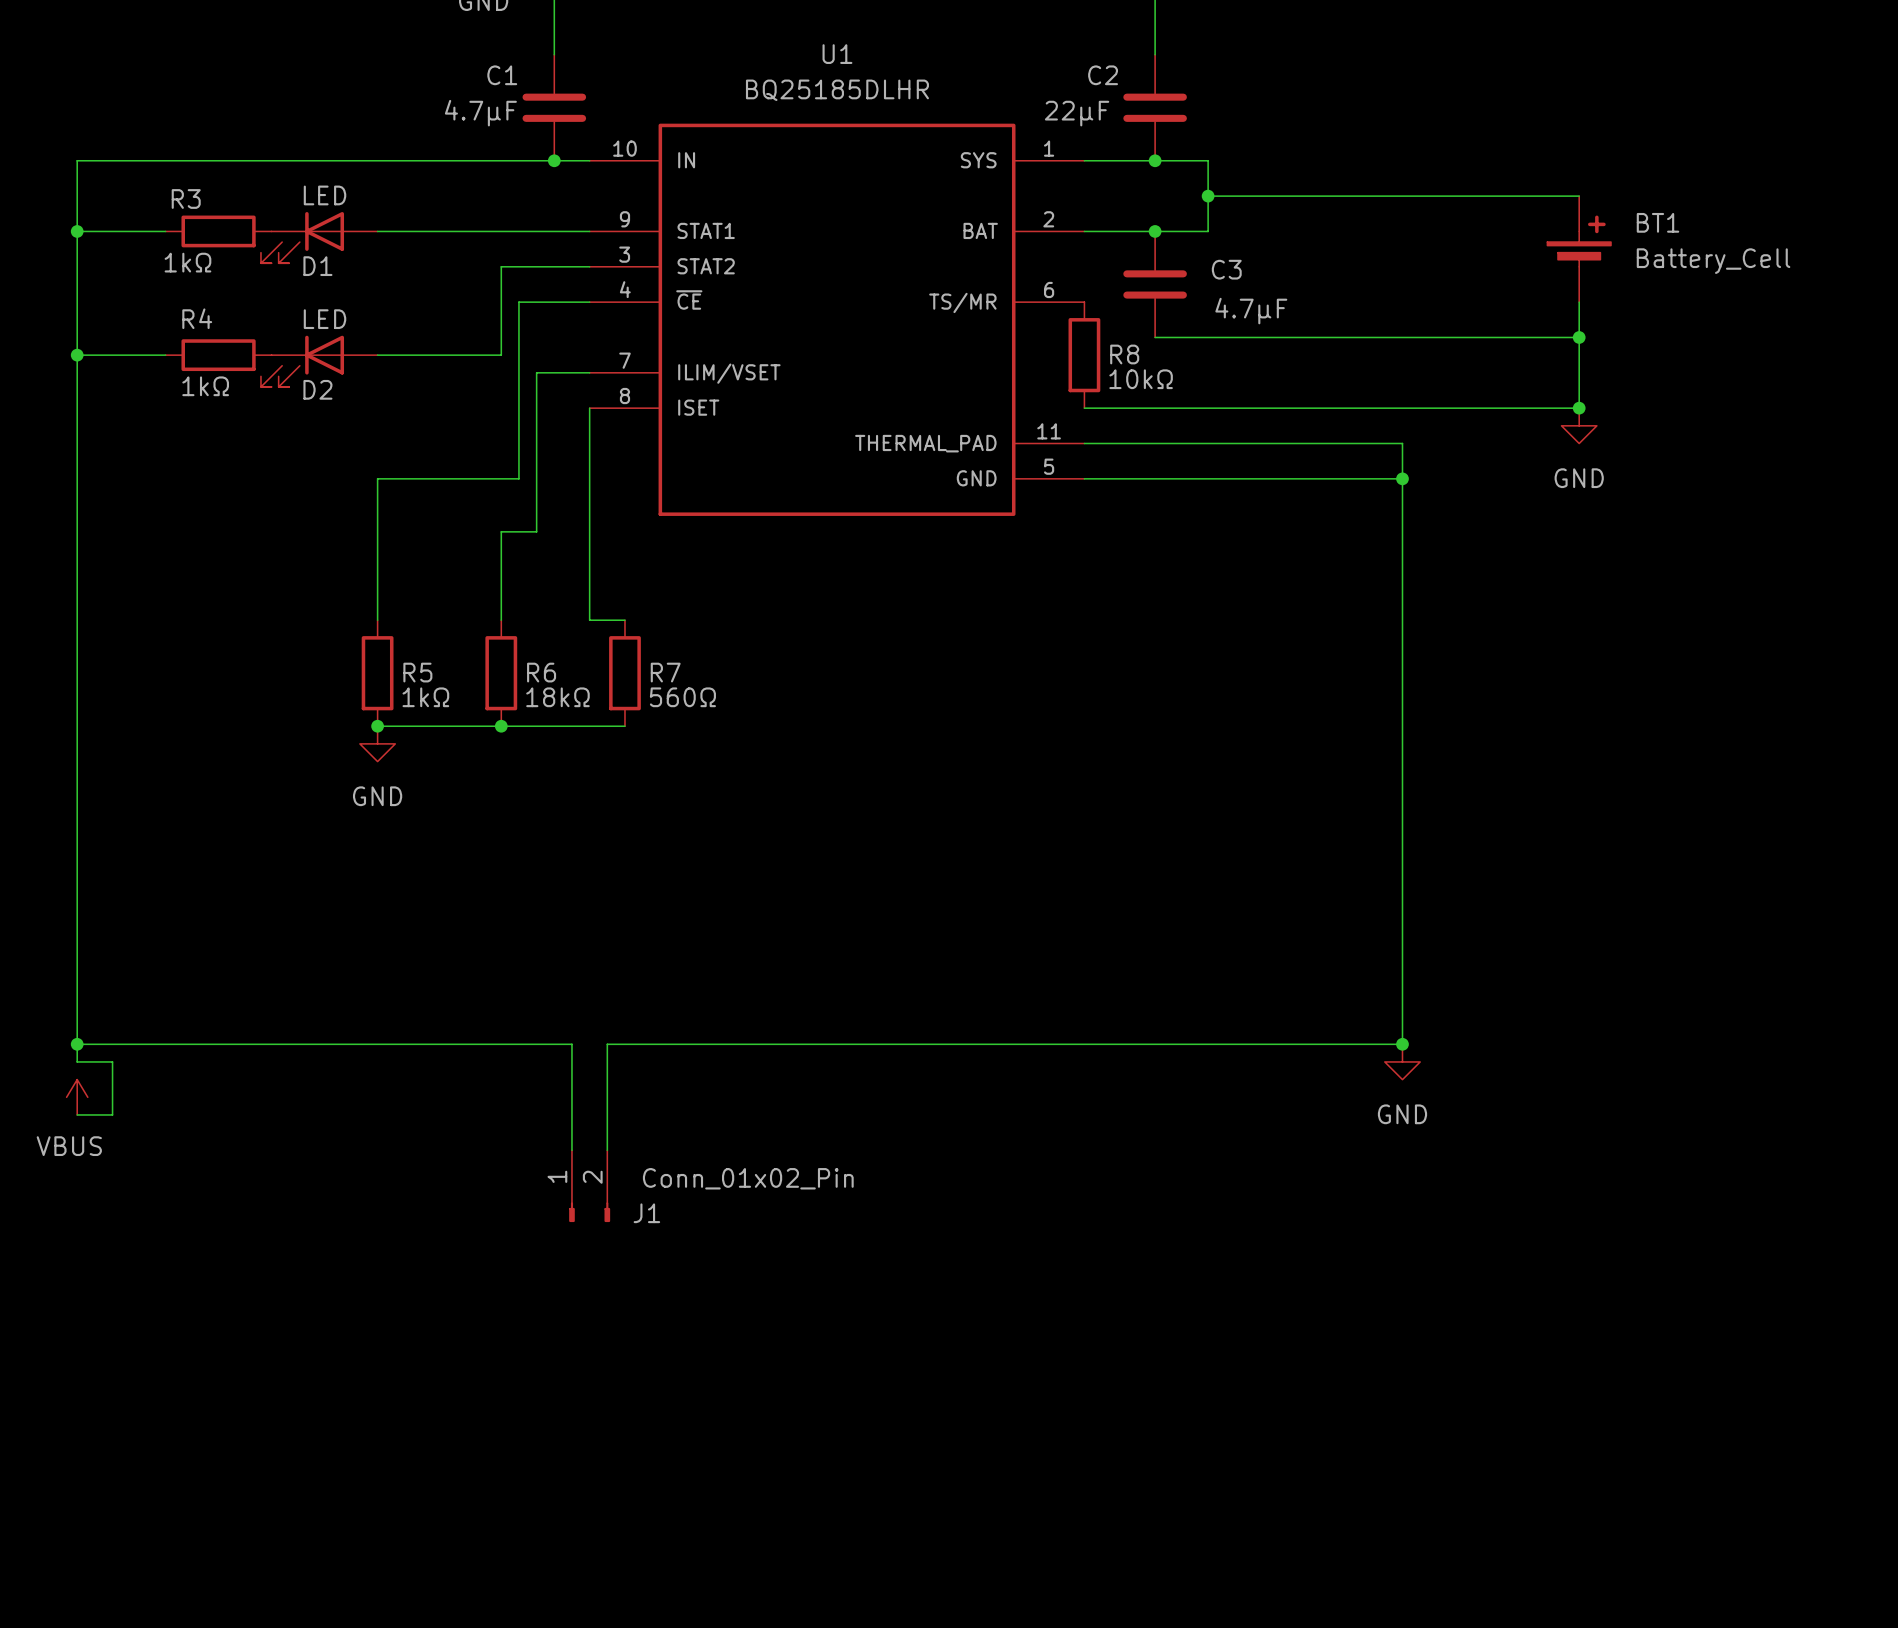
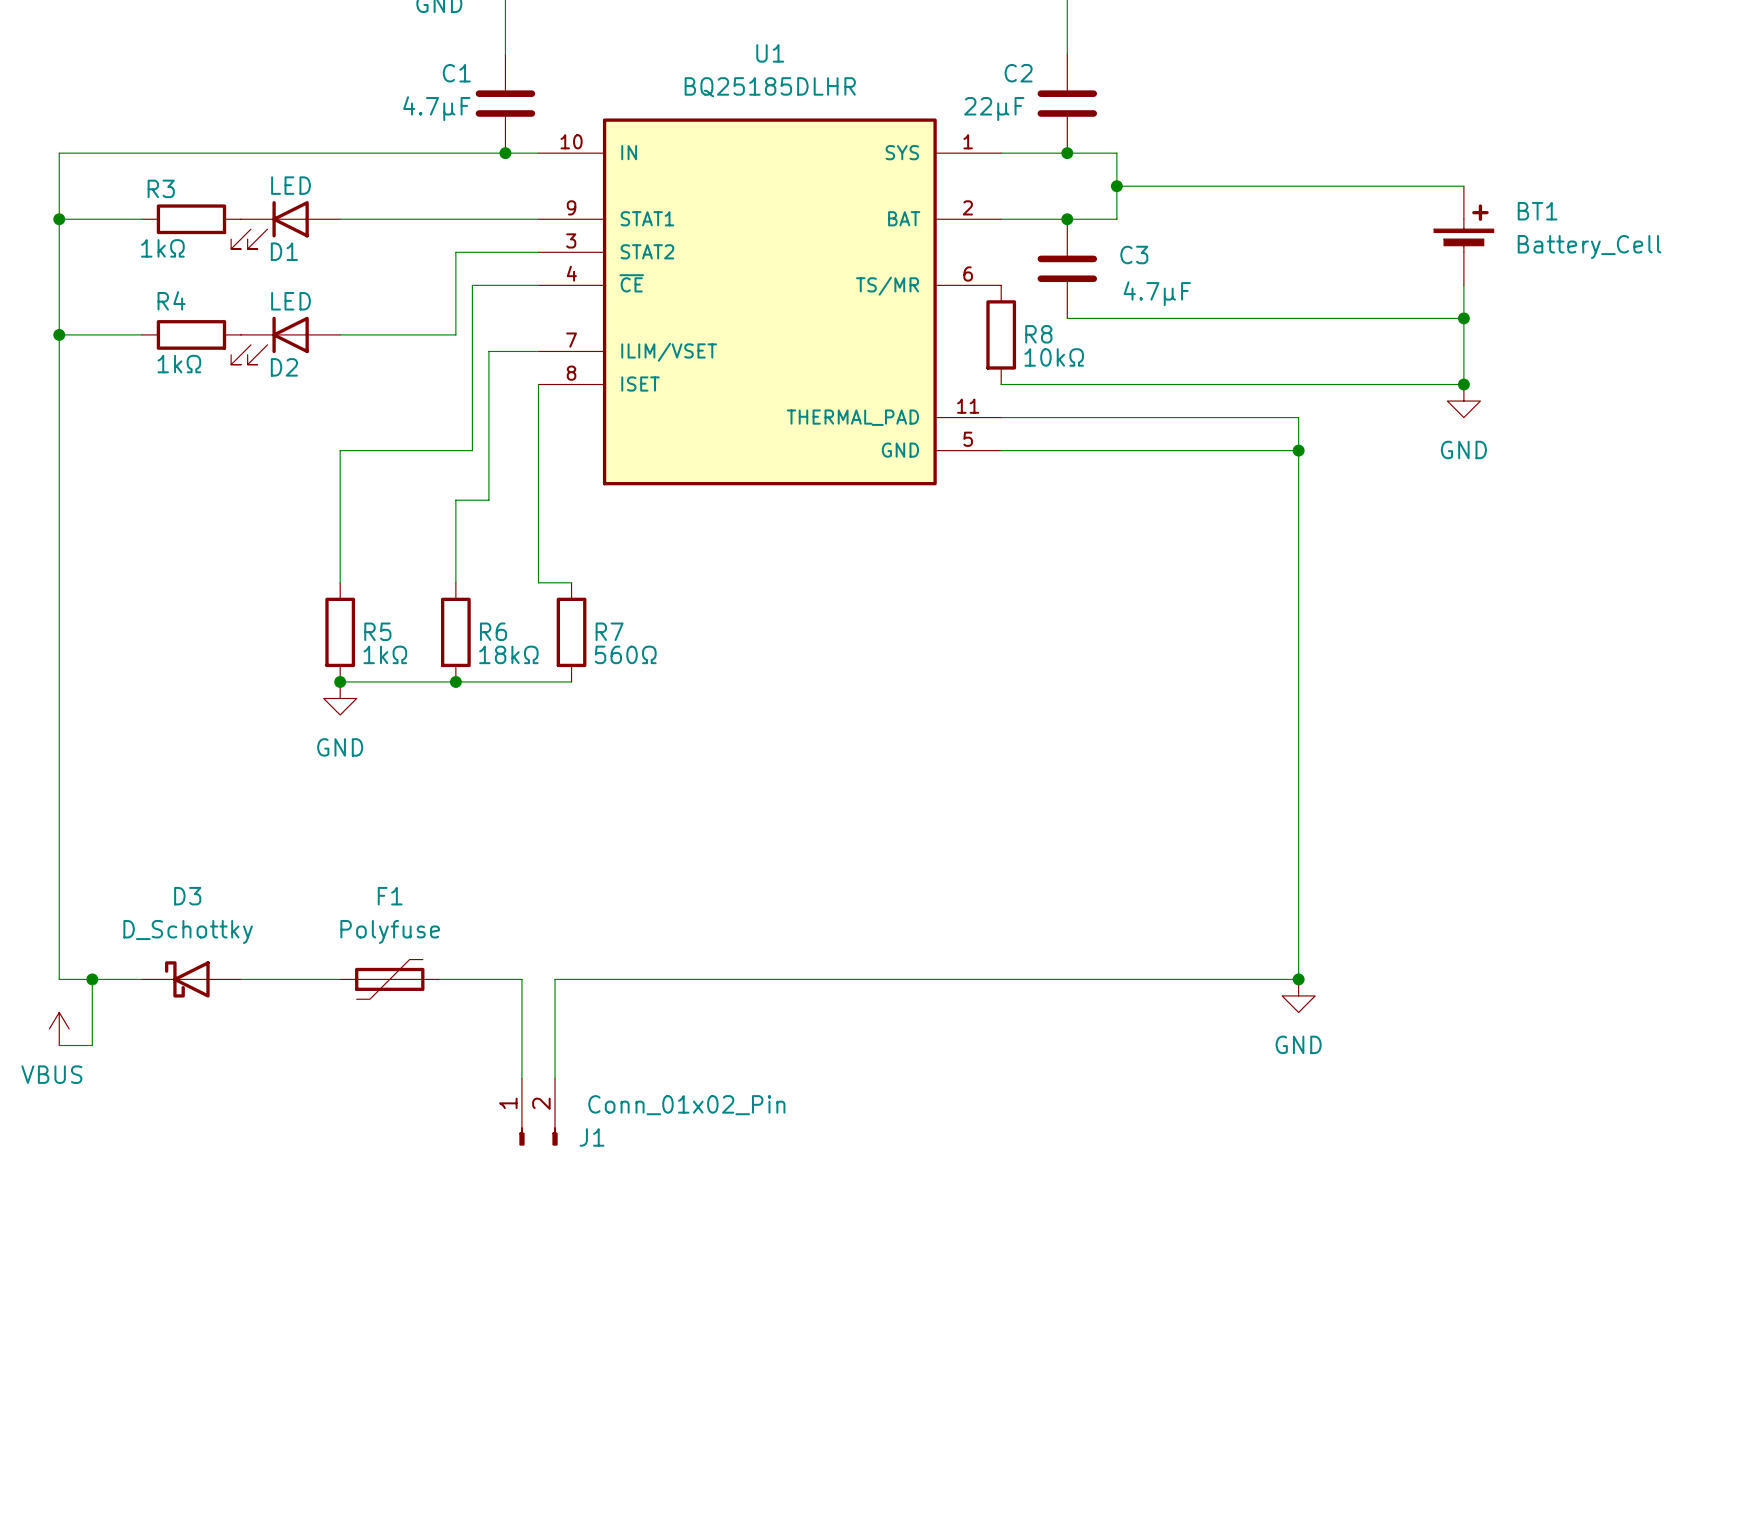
wire: (77, 1044) (77, 1061) (112, 1061) -> (92, 979) (92, 995)
junction position: (77, 1044) -> (92, 979)
D3: none -> D_Schottky (191, 979)
F1: none -> Polyfuse (389, 979)

